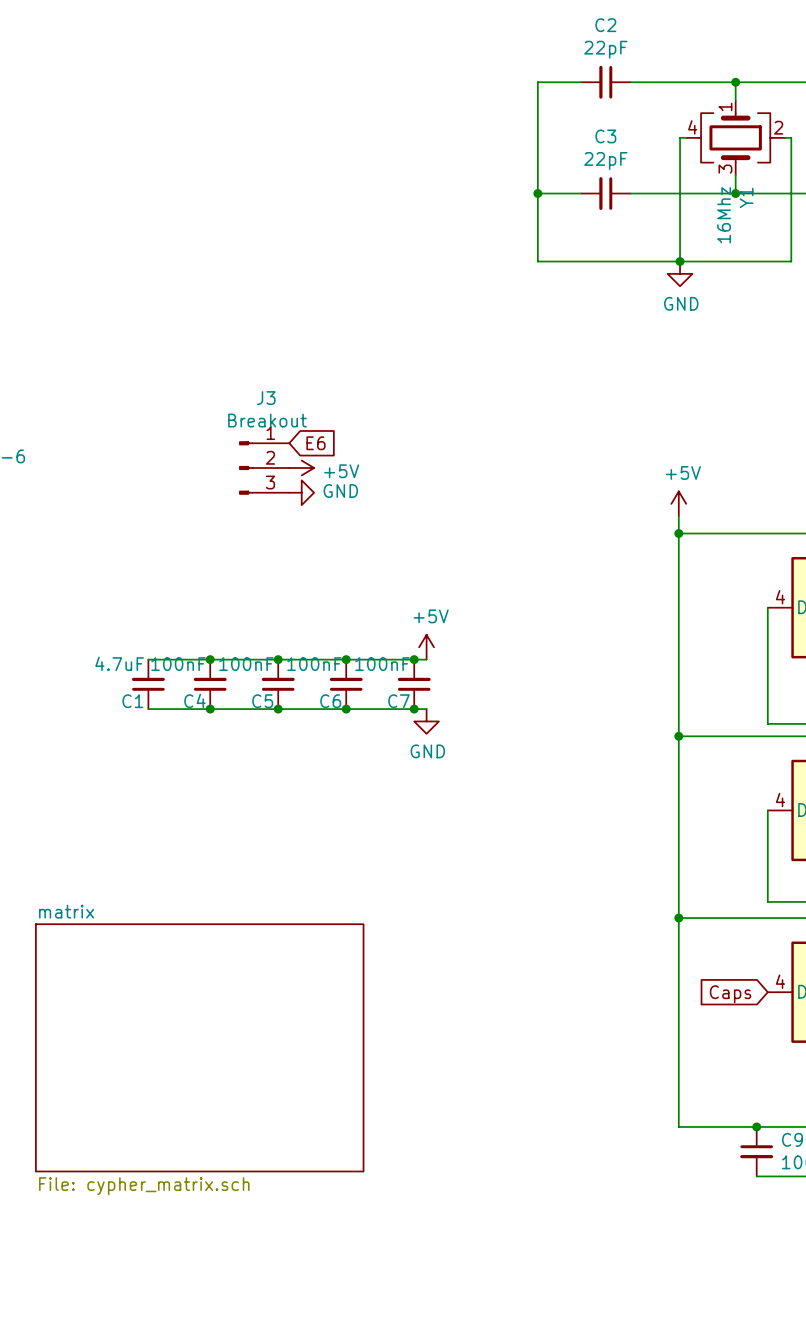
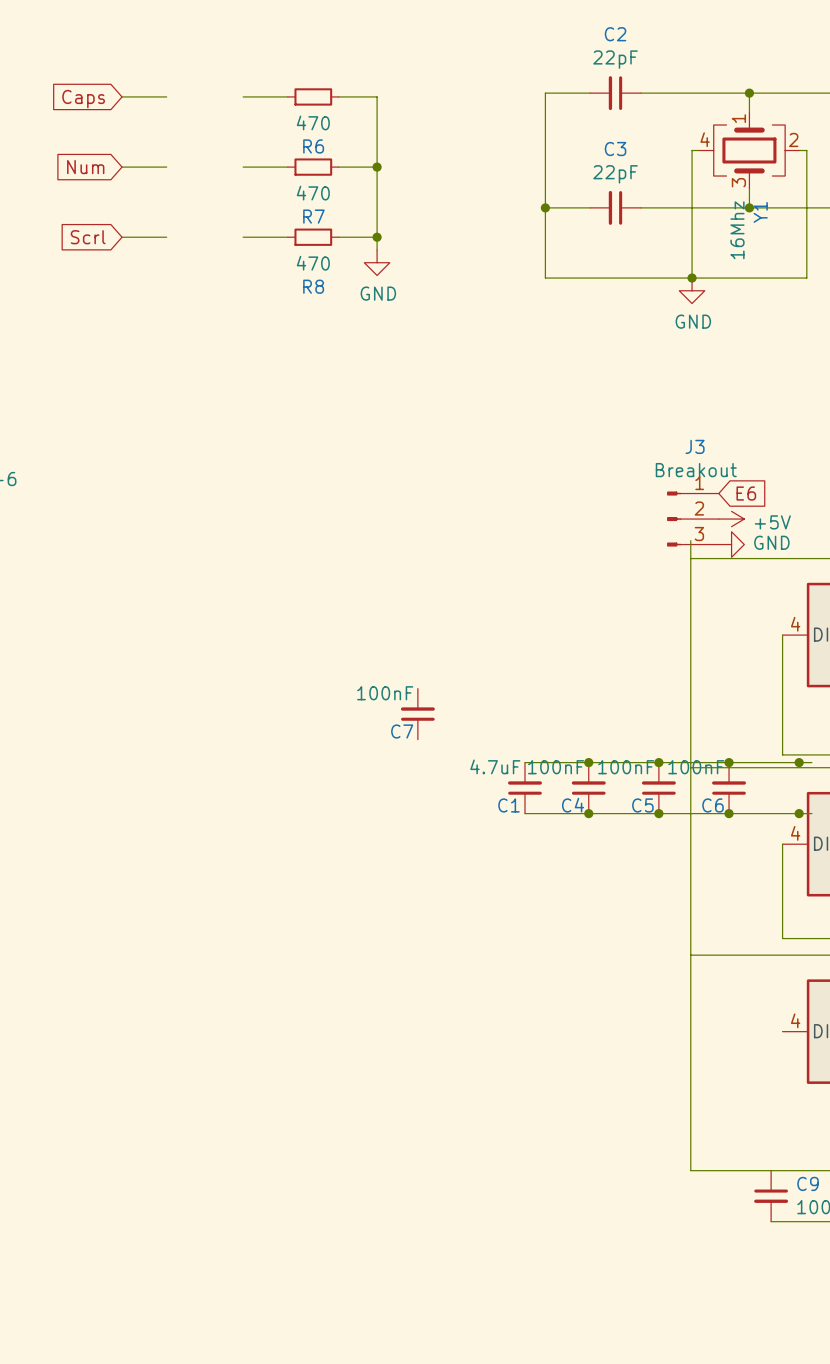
wire: none -> (122, 96) (166, 96)
wire: none -> (243, 96) (287, 96)
R6: none -> 470 (313, 96)
wire: none -> (338, 96) (377, 96) (377, 249)
global label: none -> Caps (83, 99)
global label: none -> Num (85, 167)
wire: none -> (122, 167) (166, 167)
wire: none -> (243, 167) (287, 167)
R7: none -> 470 (313, 167)
wire: none -> (338, 167) (377, 167)
junction: none -> (377, 167)
global label: none -> Scrl (88, 237)
wire: none -> (122, 237) (166, 237)
wire: none -> (243, 237) (287, 237)
R8: none -> 470 (313, 237)
wire: none -> (338, 237) (377, 237)
junction: none -> (377, 237)
power symbol: none -> GND (377, 262)
global label: E6 (316, 443) -> none
J3 position: (264, 468) -> (692, 519)
power symbol: +5V (301, 468) -> none
global label: none -> E6 (746, 493)
power symbol: GND (301, 492) -> none
power symbol rotation: 0° (678, 503) -> 90° clockwise (731, 519)
power symbol position: +5V (678, 503) -> +5V (731, 519)
power symbol: none -> GND (731, 544)
junction: (678, 533) -> none
power symbol: +5V (426, 647) -> none
wire: (148, 659) (426, 659) -> none
junction: (210, 659) -> none
junction: (278, 659) -> none
junction: (346, 659) -> none
junction: (414, 659) -> none
C1 position: (148, 684) -> (525, 788)
C4 position: (210, 684) -> (588, 788)
C5 position: (278, 684) -> (658, 788)
C6 position: (346, 684) -> (729, 788)
wire: (148, 709) (426, 709) -> none
junction: (210, 709) -> none
junction: (278, 709) -> none
junction: (346, 709) -> none
junction: (414, 709) -> none
power symbol: GND (426, 721) -> none
wire: none -> (525, 762) (811, 762)
junction: none -> (588, 762)
junction: none -> (658, 762)
junction: none -> (729, 762)
junction: none -> (799, 762)
junction: (678, 736) -> none
wire: none -> (525, 813) (811, 813)
junction: none -> (588, 813)
junction: none -> (658, 813)
junction: none -> (729, 813)
junction: none -> (799, 813)
junction: (678, 918) -> none
global label: Caps (730, 994) -> none
sheet matrix: File: cypher_matrix.sch (199, 1047) -> none
junction: (756, 1126) -> none

